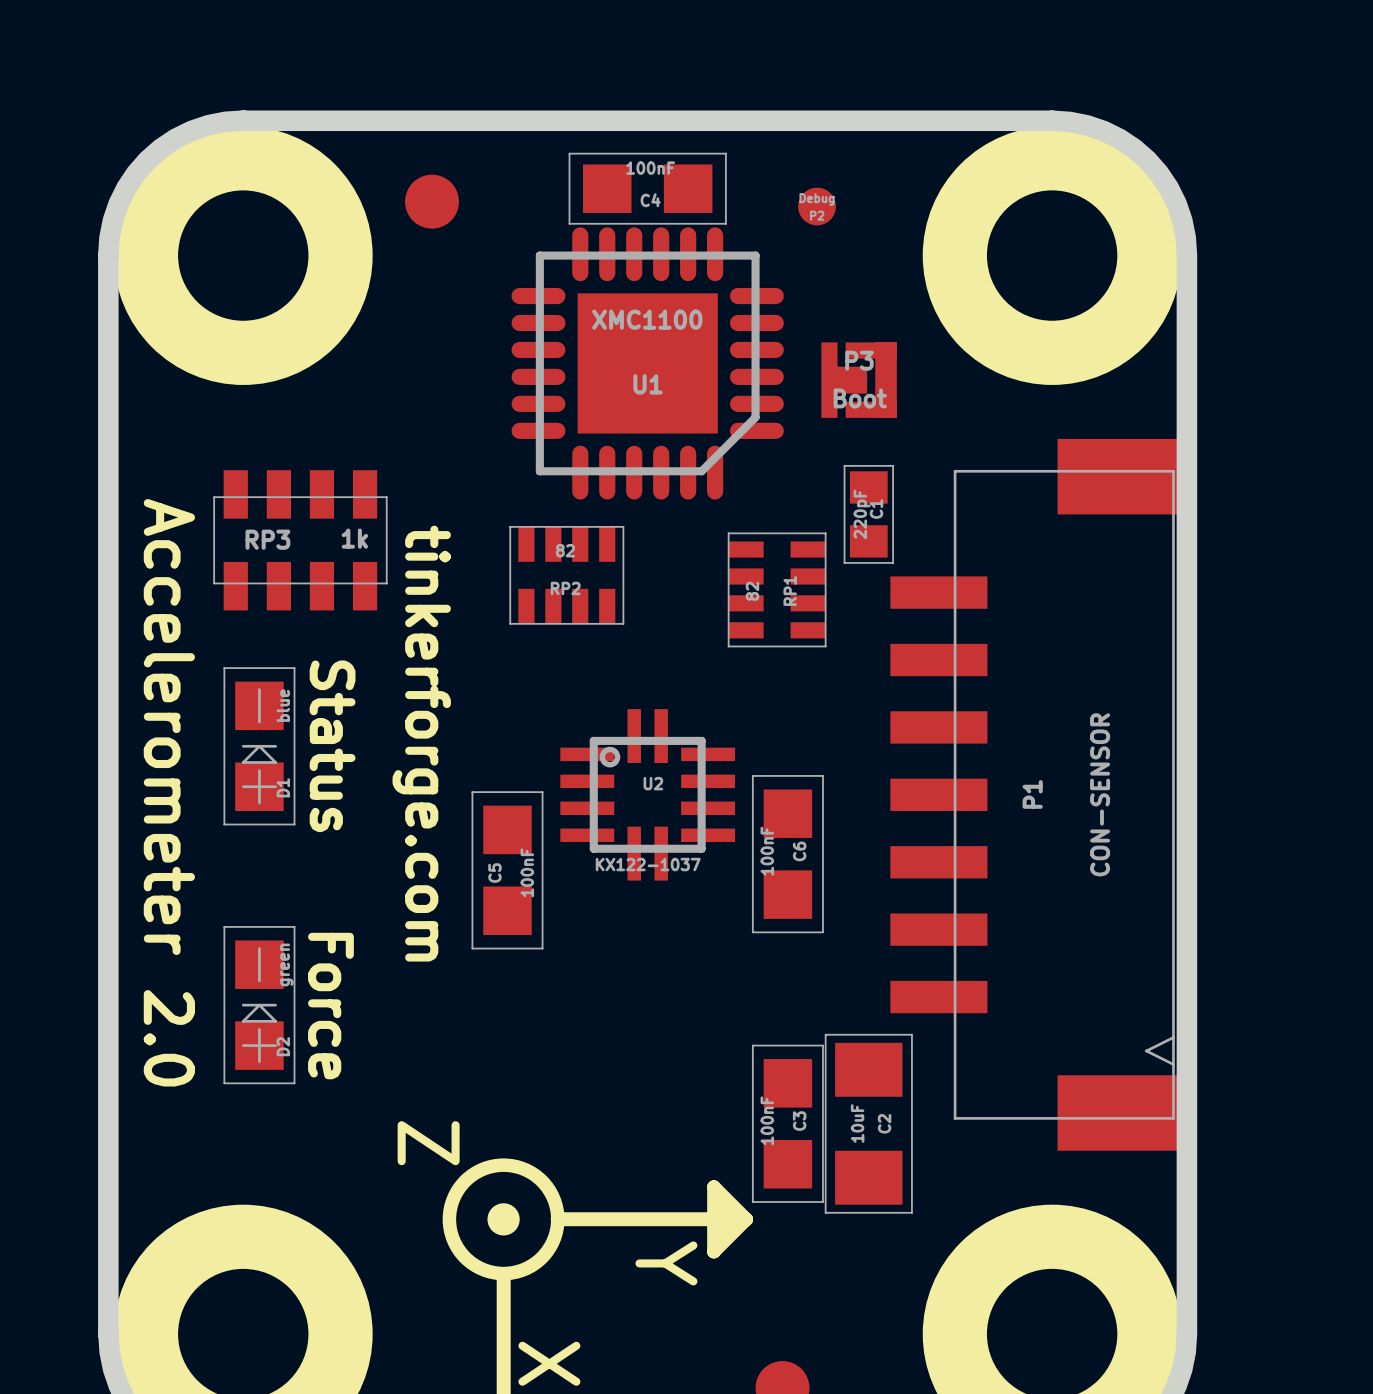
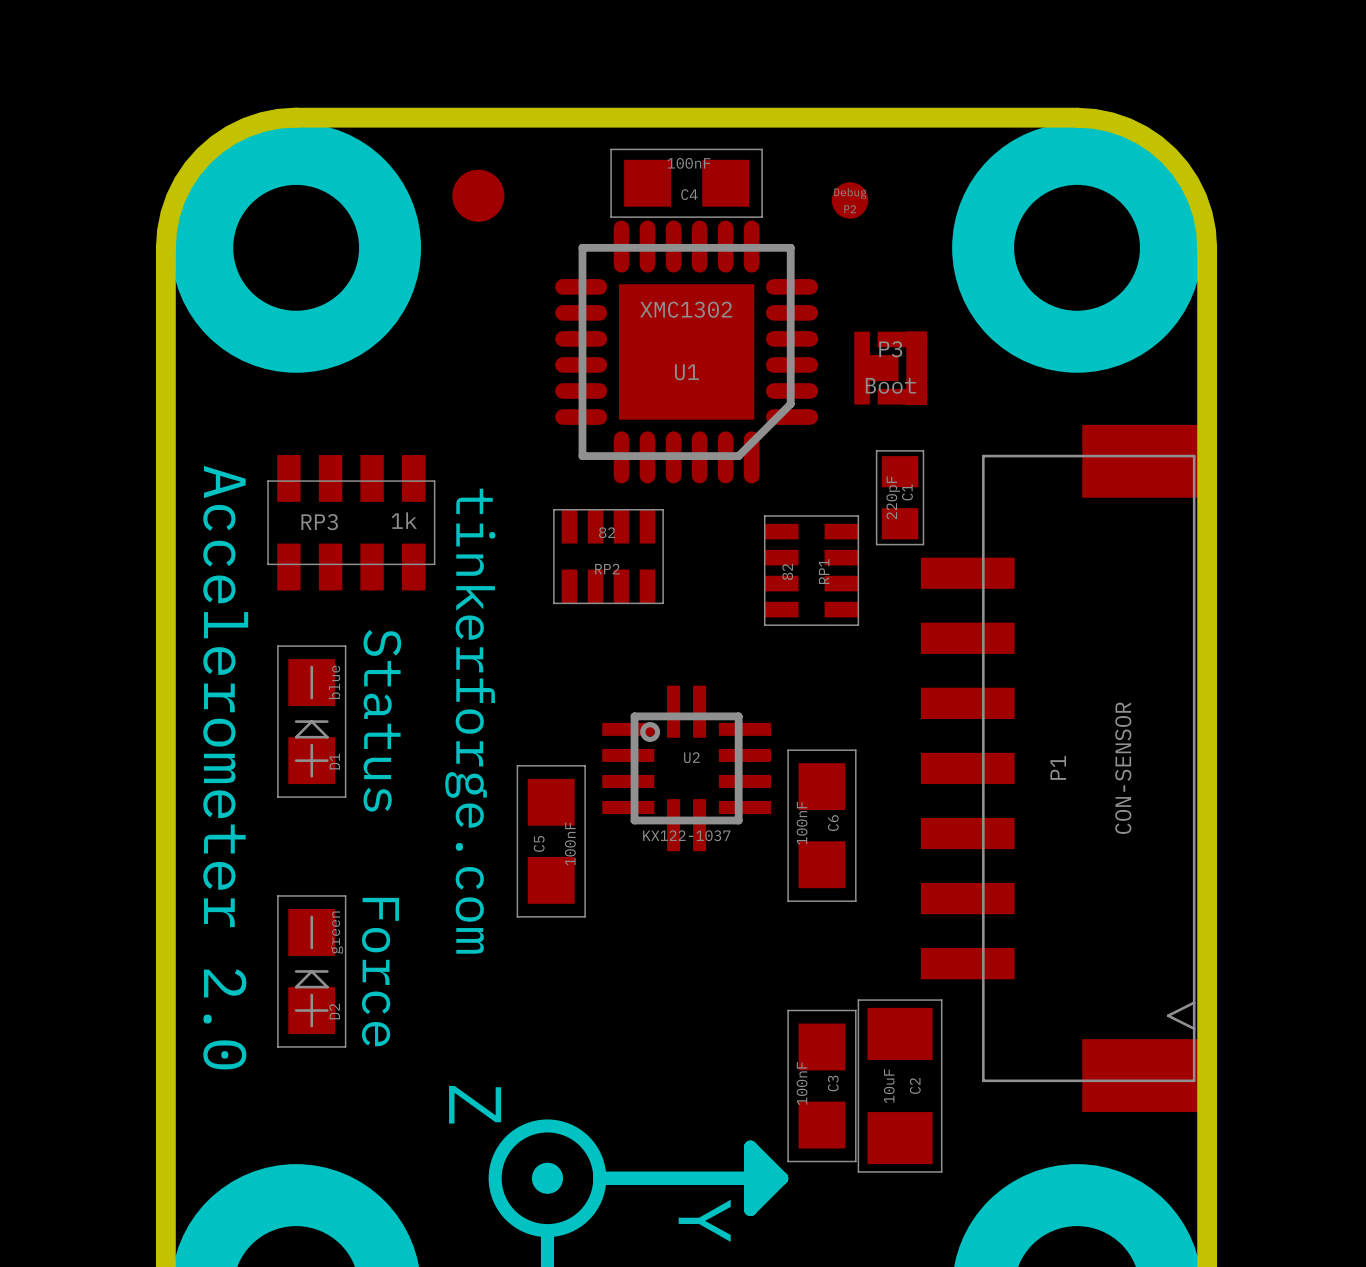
U1 value: XMC1100 (647, 319) -> XMC1302 (686, 309)

